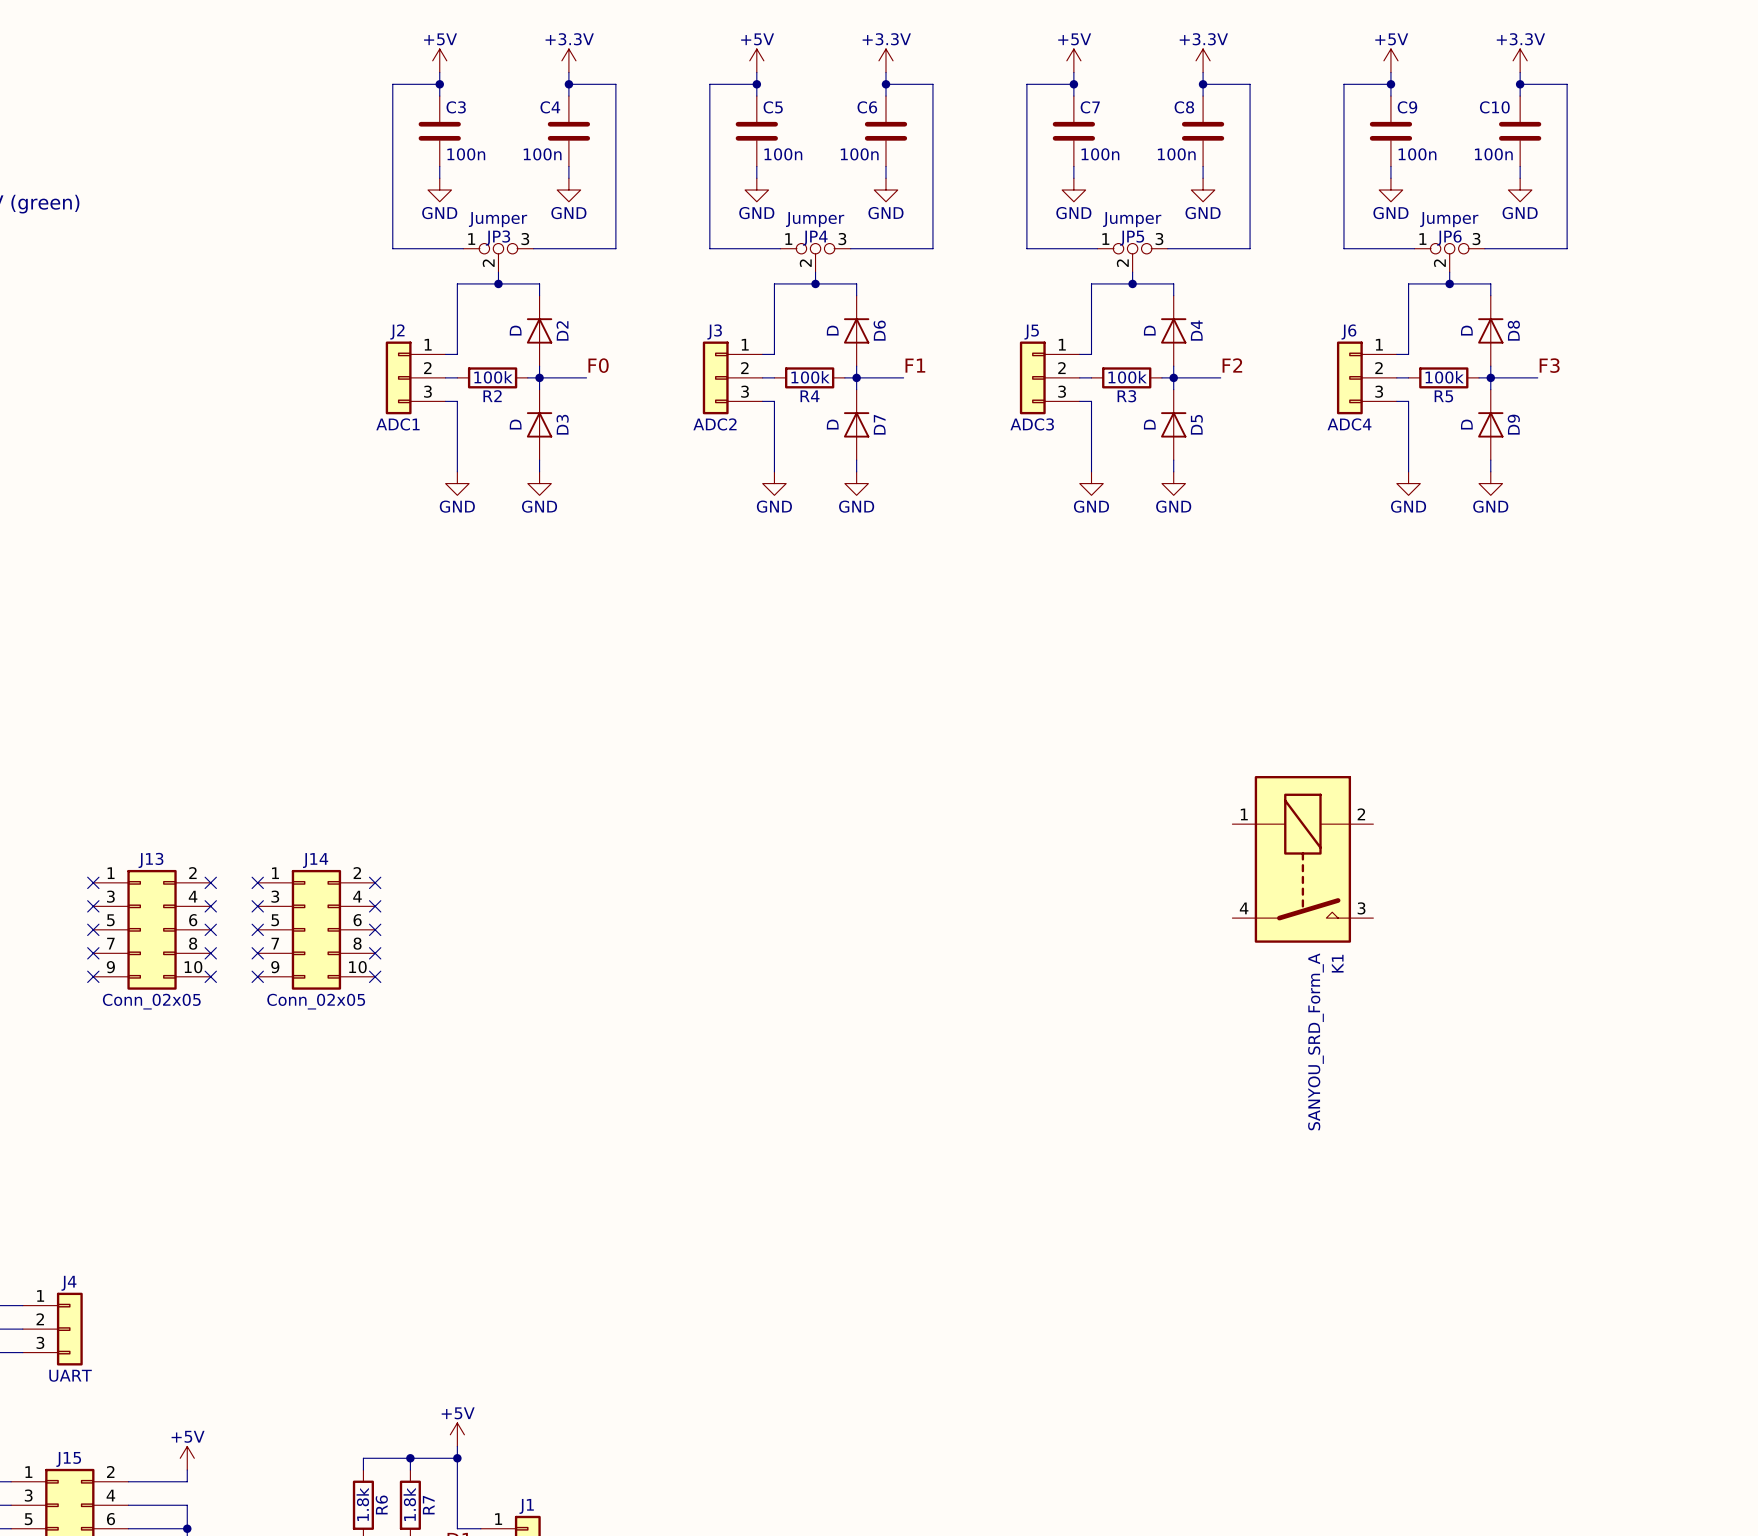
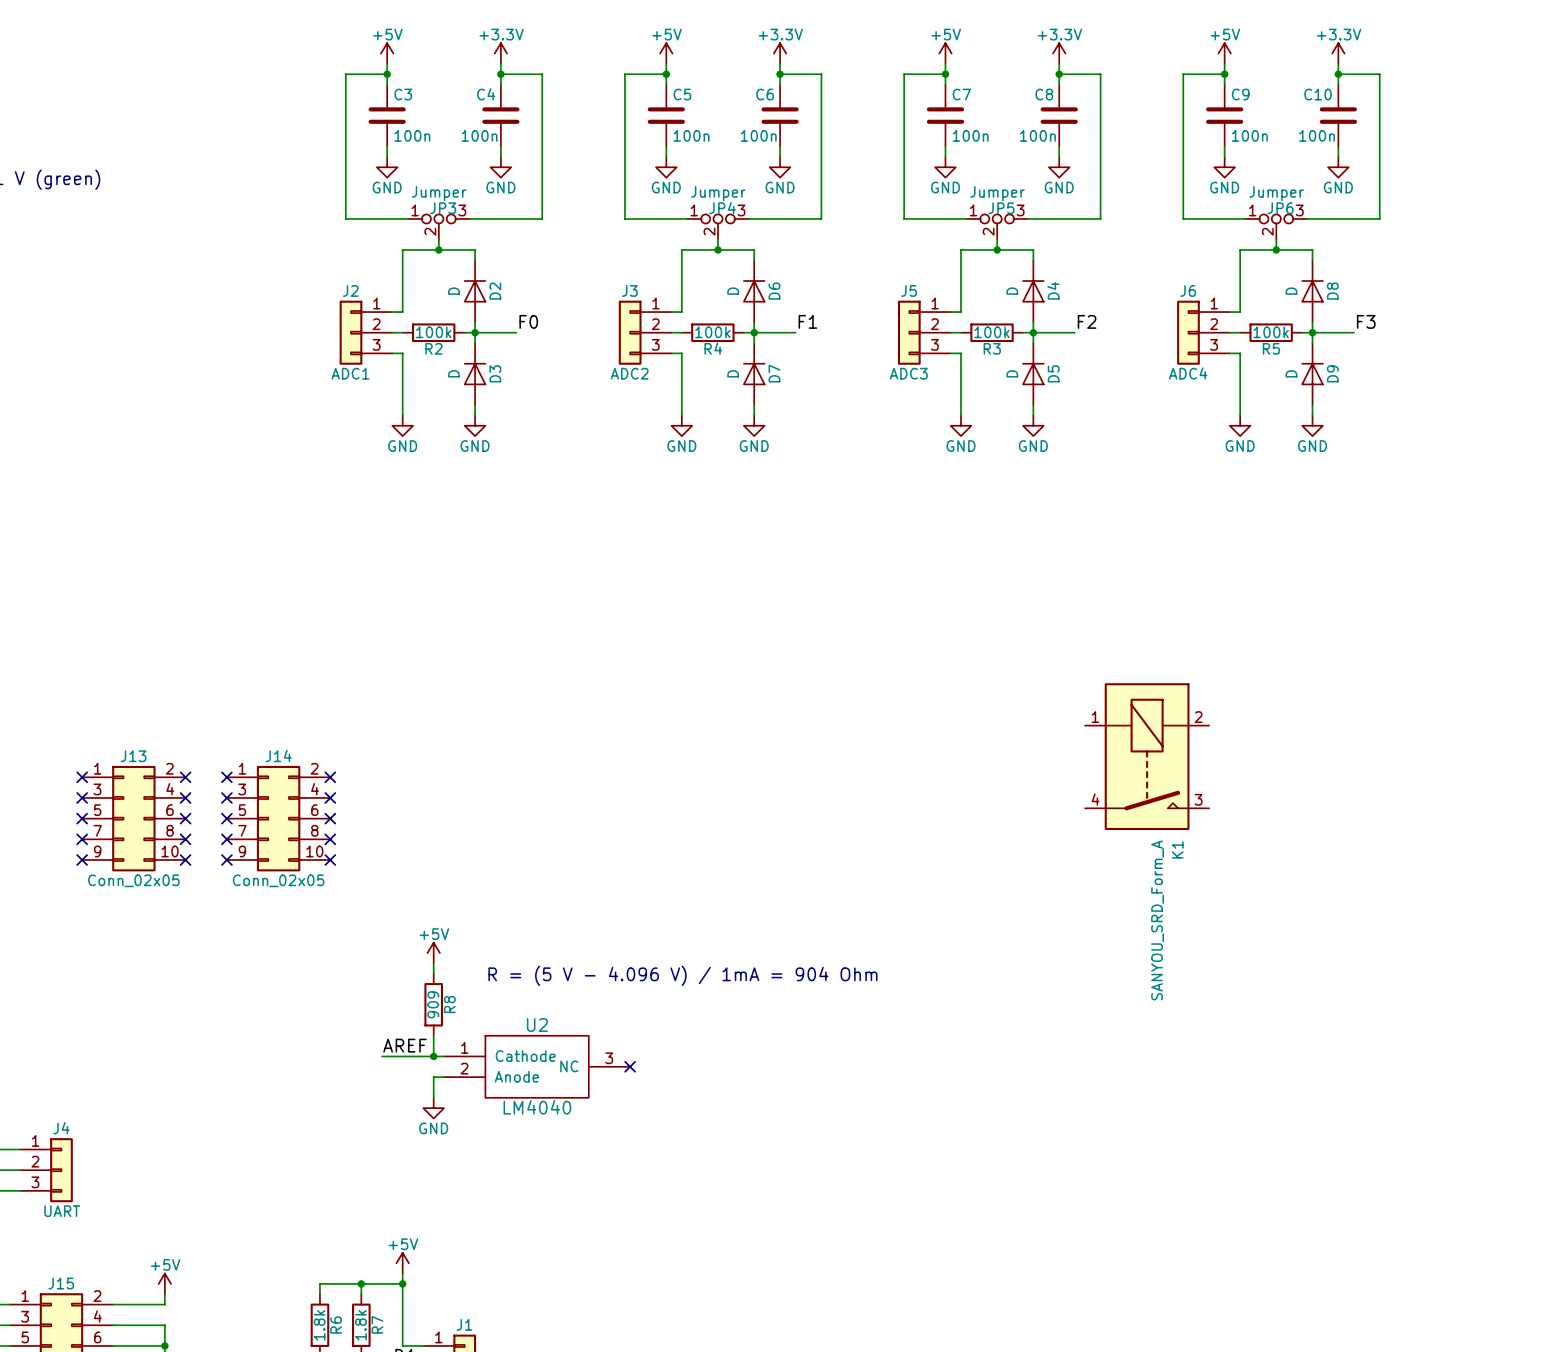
power symbol: none -> +5V (433, 953)
wire: none -> (433, 963) (433, 973)
text: none -> R = (5 V - 4.096 V) / 1mA = 904 Ohm (682, 975)
R8: none -> 909 (433, 1004)
wire: none -> (433, 1035) (433, 1056)
label: none -> AREF (404, 1045)
wire: none -> (382, 1056) (444, 1056)
junction: none -> (433, 1056)
U2: none -> LM4040 (537, 1066)
no-connect mark: none -> (630, 1066)
wire: none -> (444, 1077) (433, 1077) (433, 1097)
power symbol: none -> GND (433, 1108)

